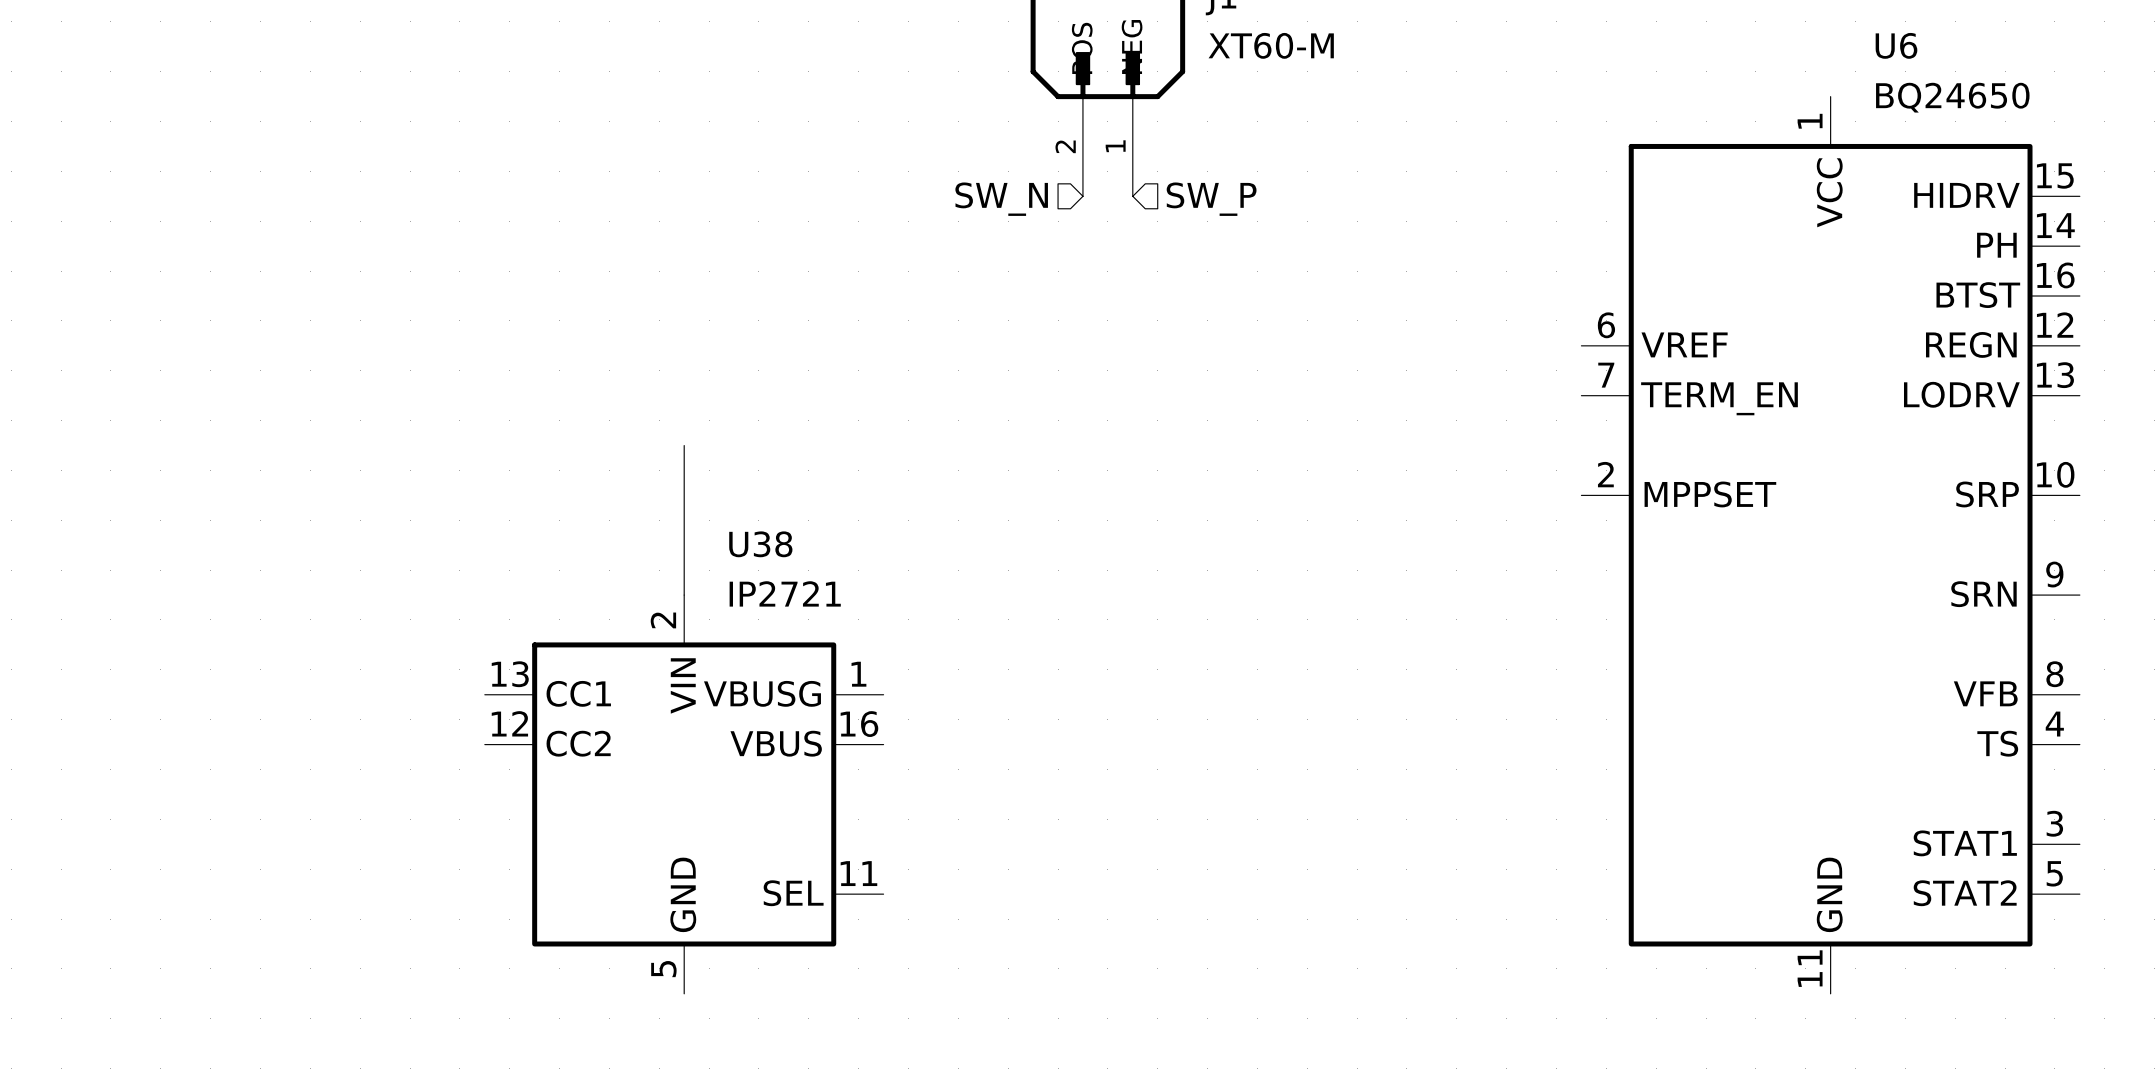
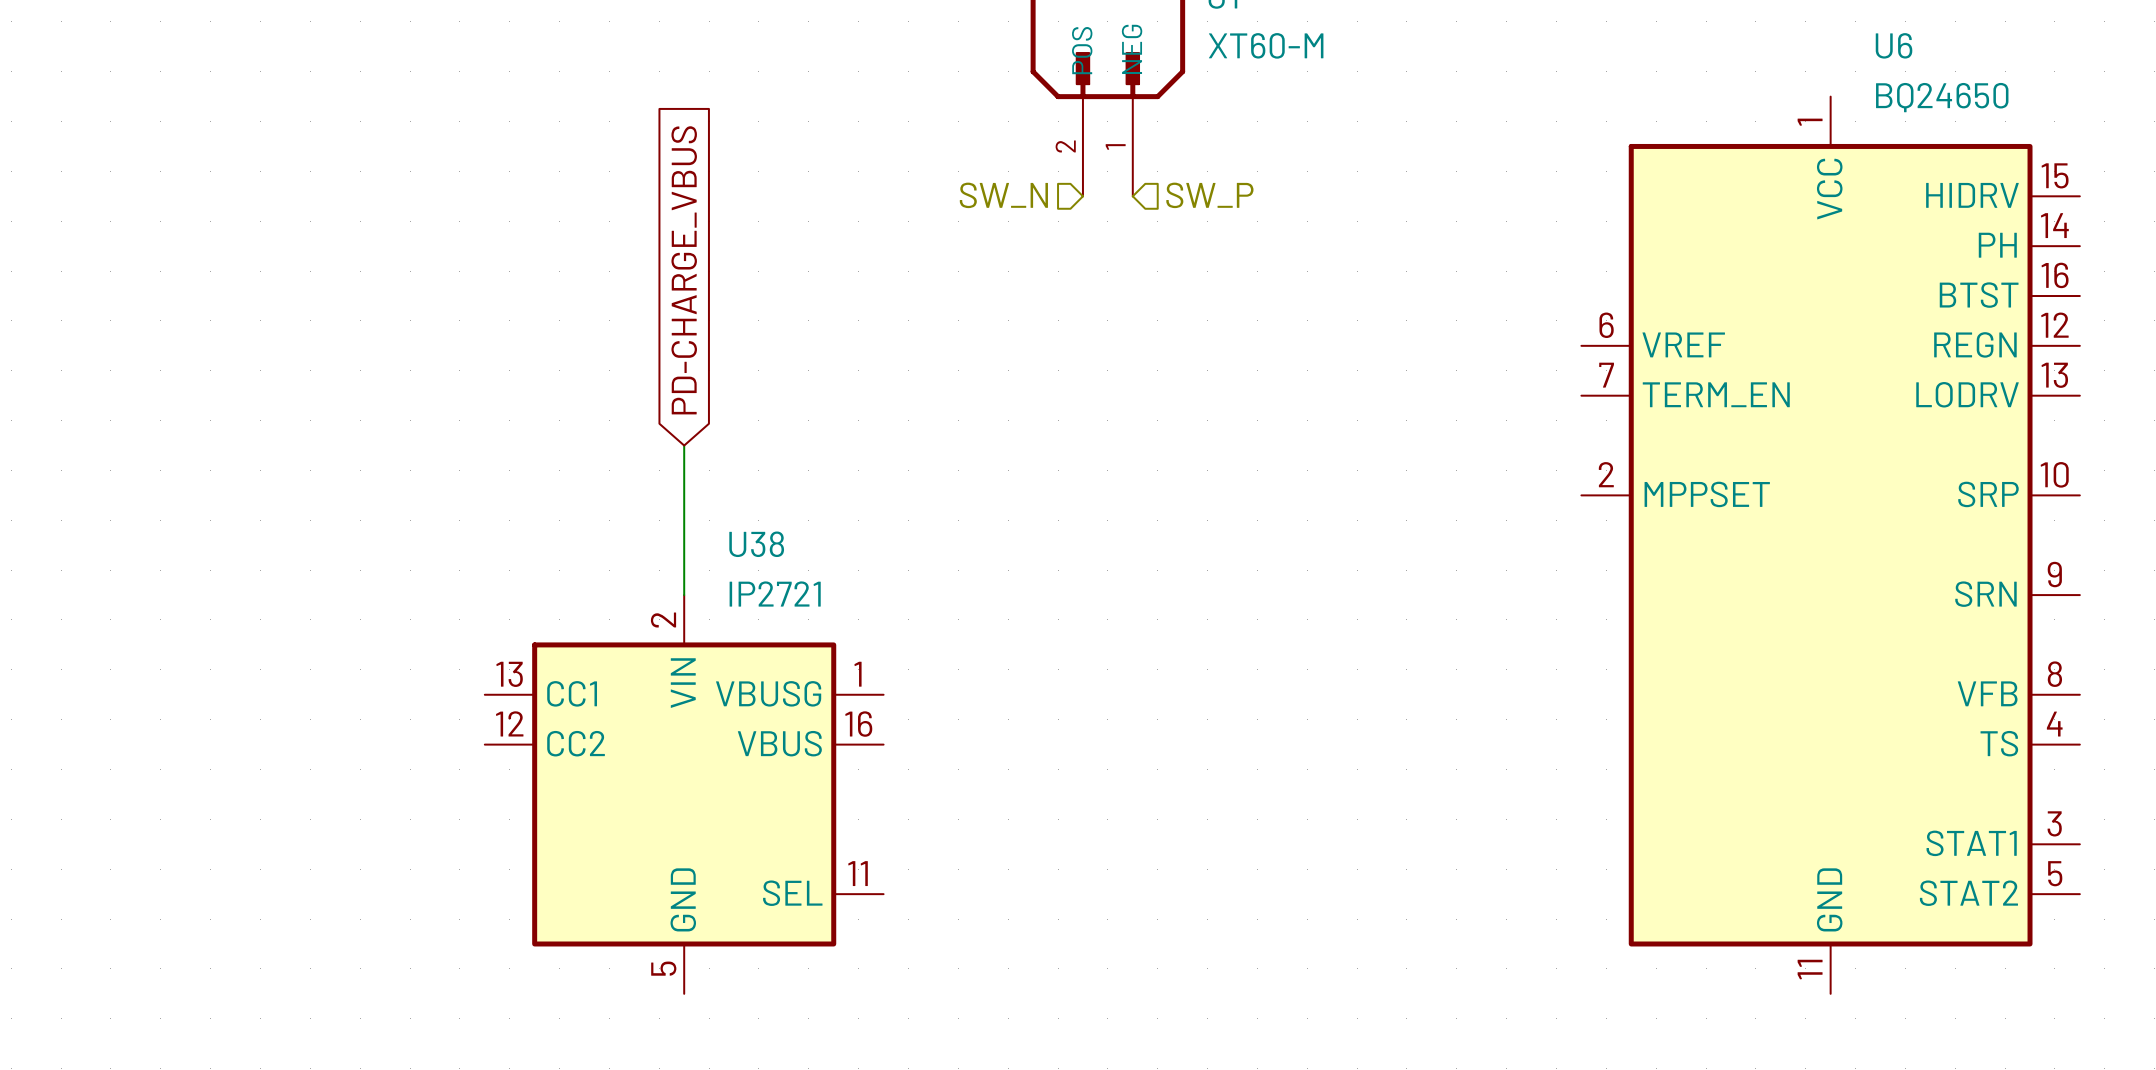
global label: none -> PD-CHARGE_VBUS (684, 270)

